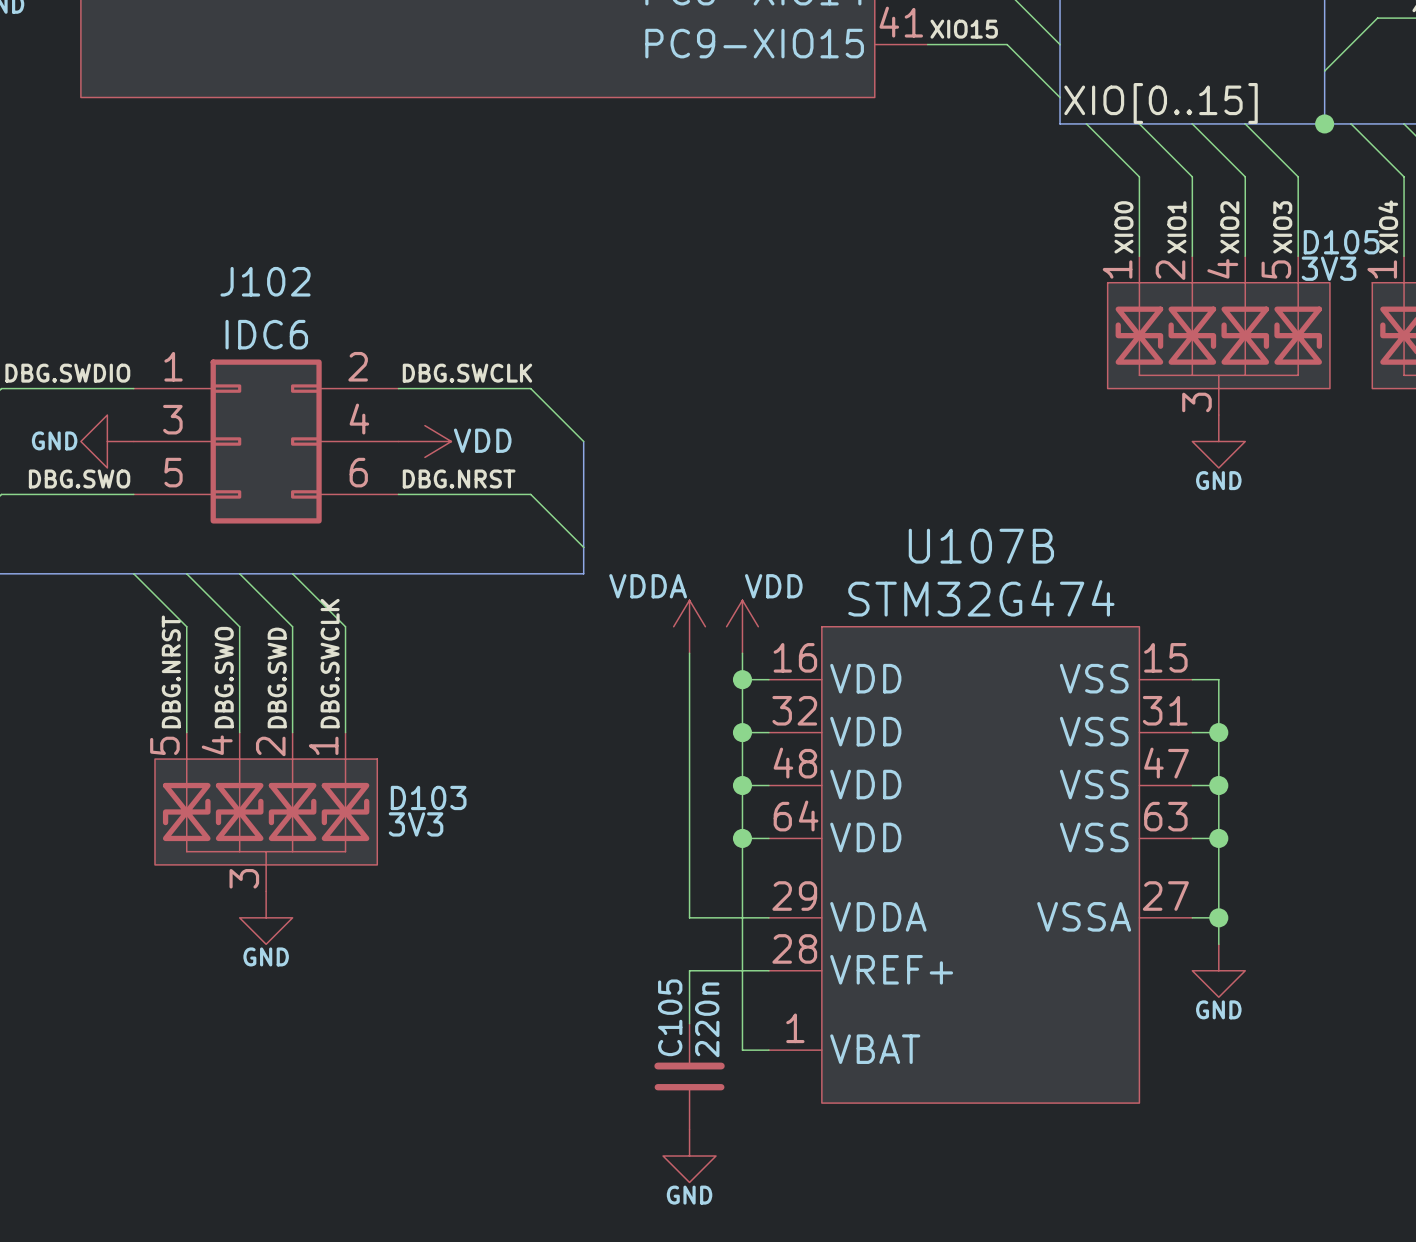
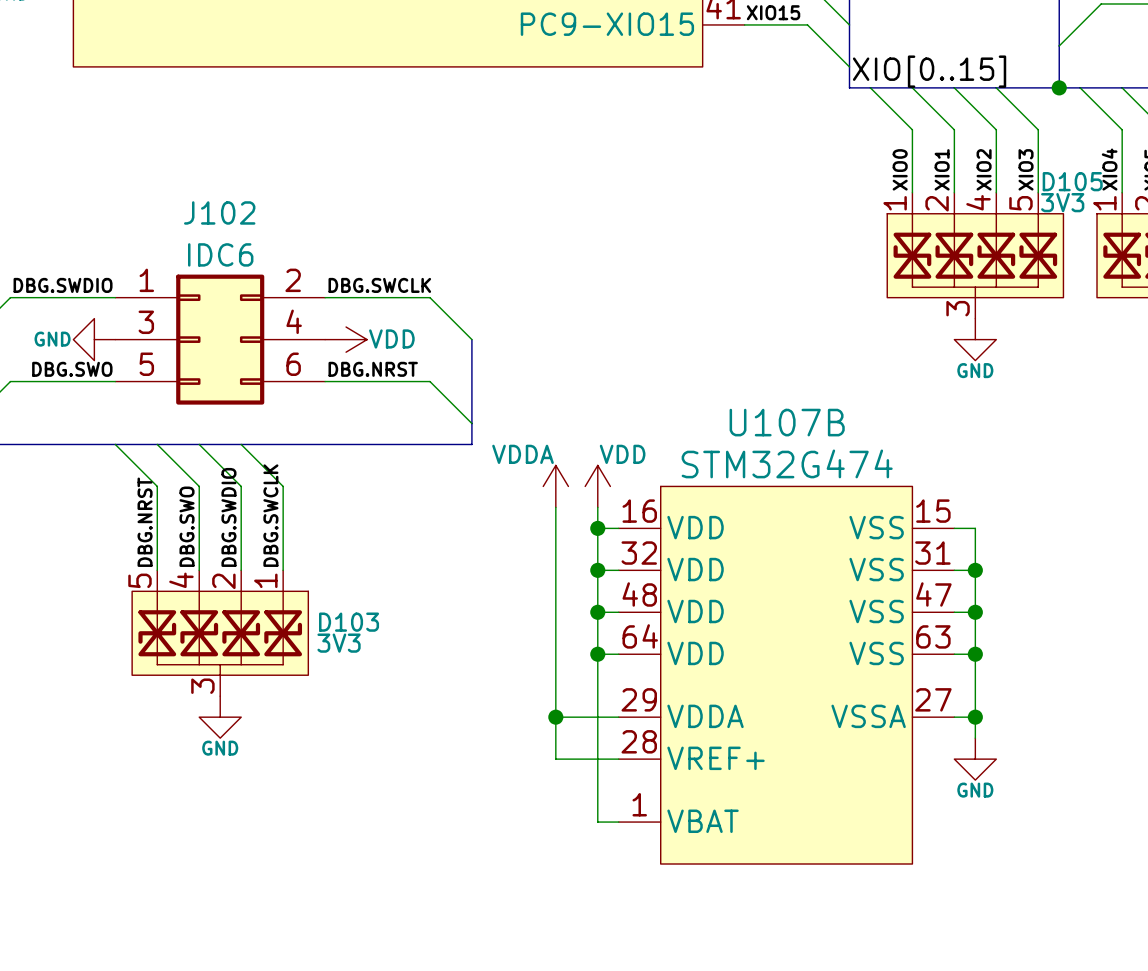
label: DBG.SWD (277, 677) -> DBG.SWDIO (228, 517)
junction: none -> (555, 717)
wire: (689, 970) (689, 1023) -> (555, 759) (555, 717)
C105: 220n (689, 1076) -> none
power symbol: GND (689, 1156) -> none

